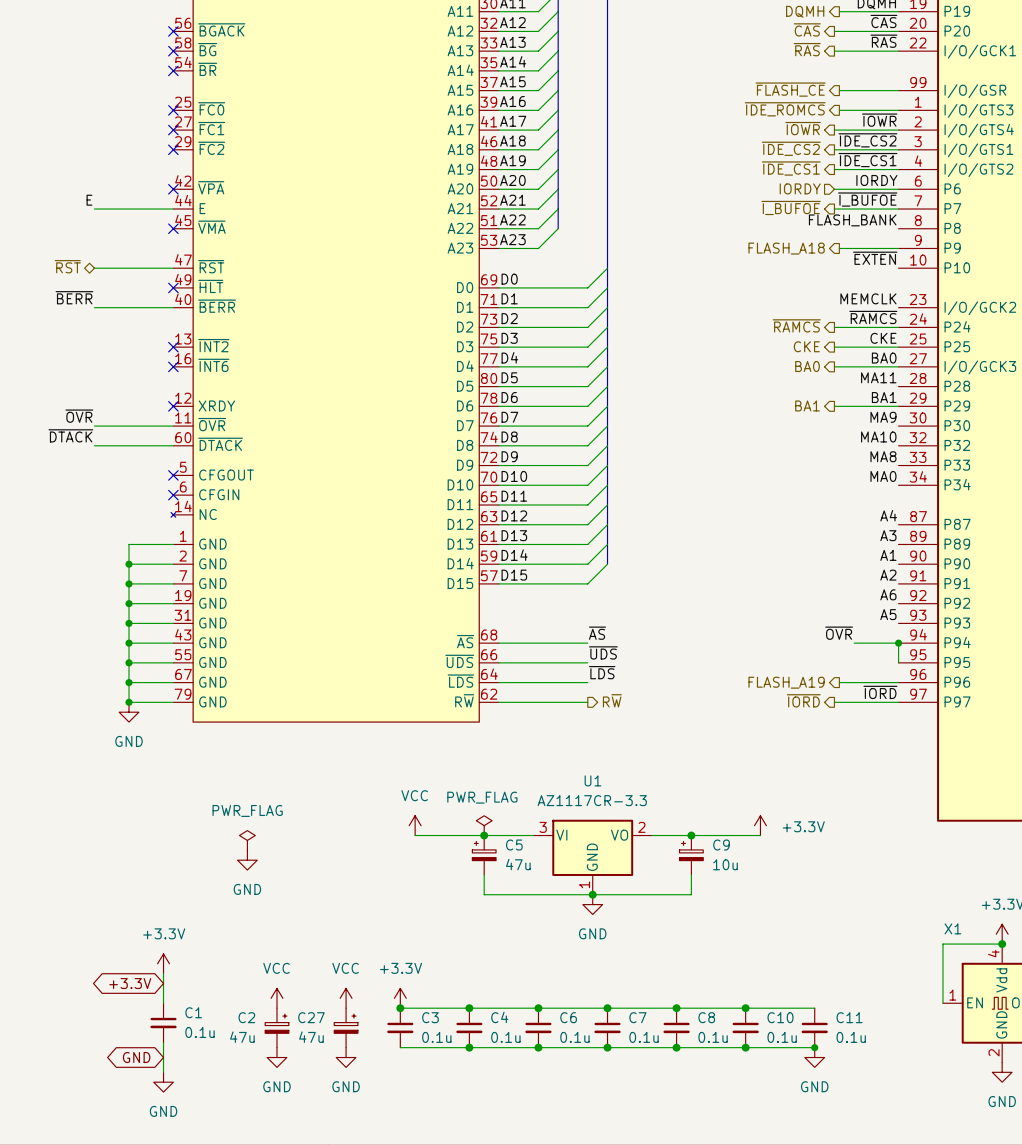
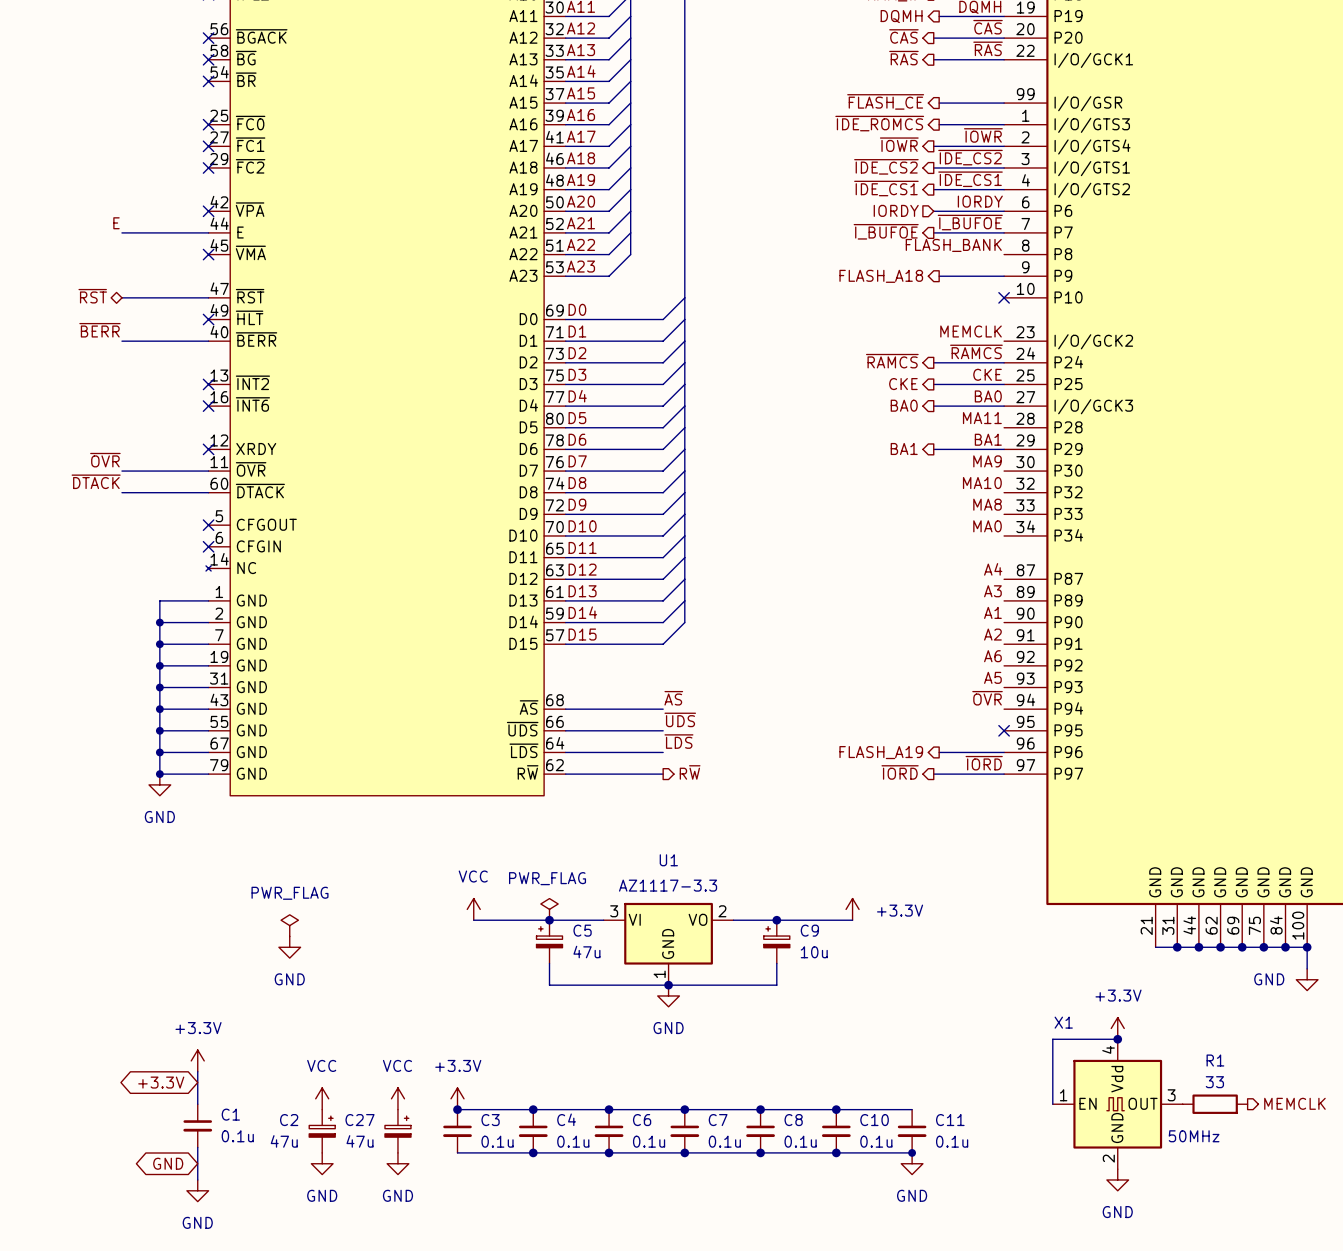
label: ~{EXTEN} (875, 258) -> none
no-connect mark: none -> (1004, 297)
label position: ~{OVR} (839, 633) -> ~{OVR} (987, 698)
wire: (854, 643) (898, 643) (898, 662) -> none
junction: (898, 643) -> none
no-connect mark: none -> (1004, 730)
U1 value: AZ1117CR-3.3 (592, 800) -> AZ1117-3.3 (668, 885)

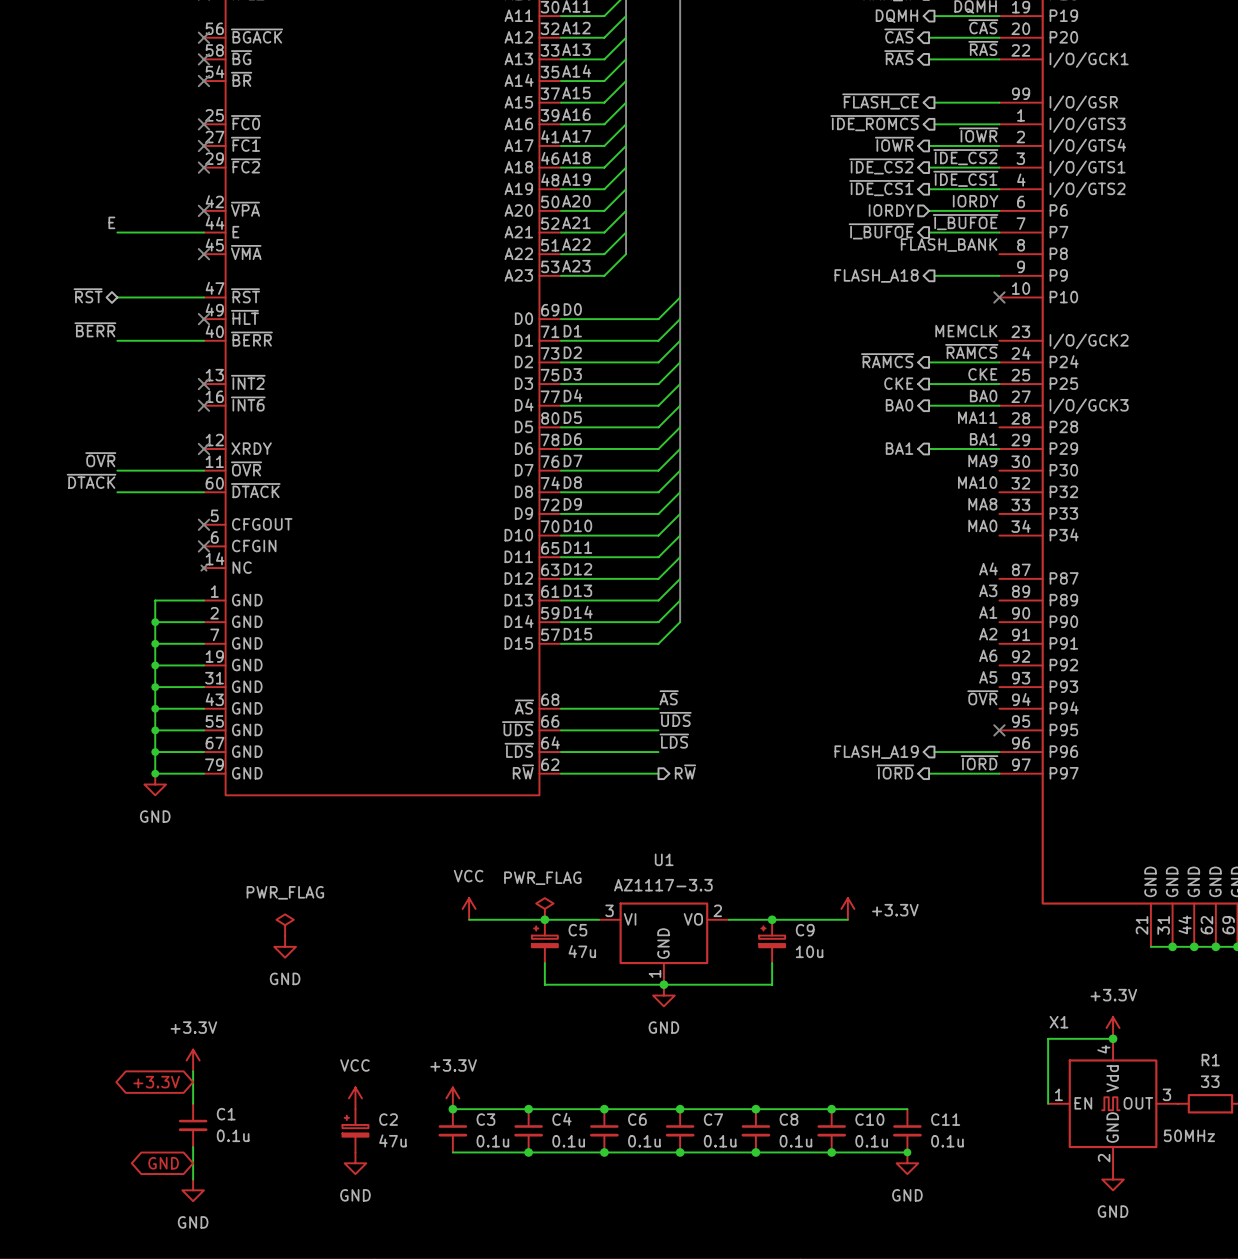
power symbol: VCC (322, 1098) -> none
power symbol: none -> VCC (355, 1098)
power symbol: VCC (397, 1098) -> none
C2 flip: as is (322, 1126) -> left-right (355, 1126)
C2 position: (322, 1131) -> (355, 1130)
C27: 47u (397, 1131) -> none
power symbol: GND (322, 1163) -> none
power symbol: none -> GND (355, 1163)
power symbol: GND (397, 1163) -> none

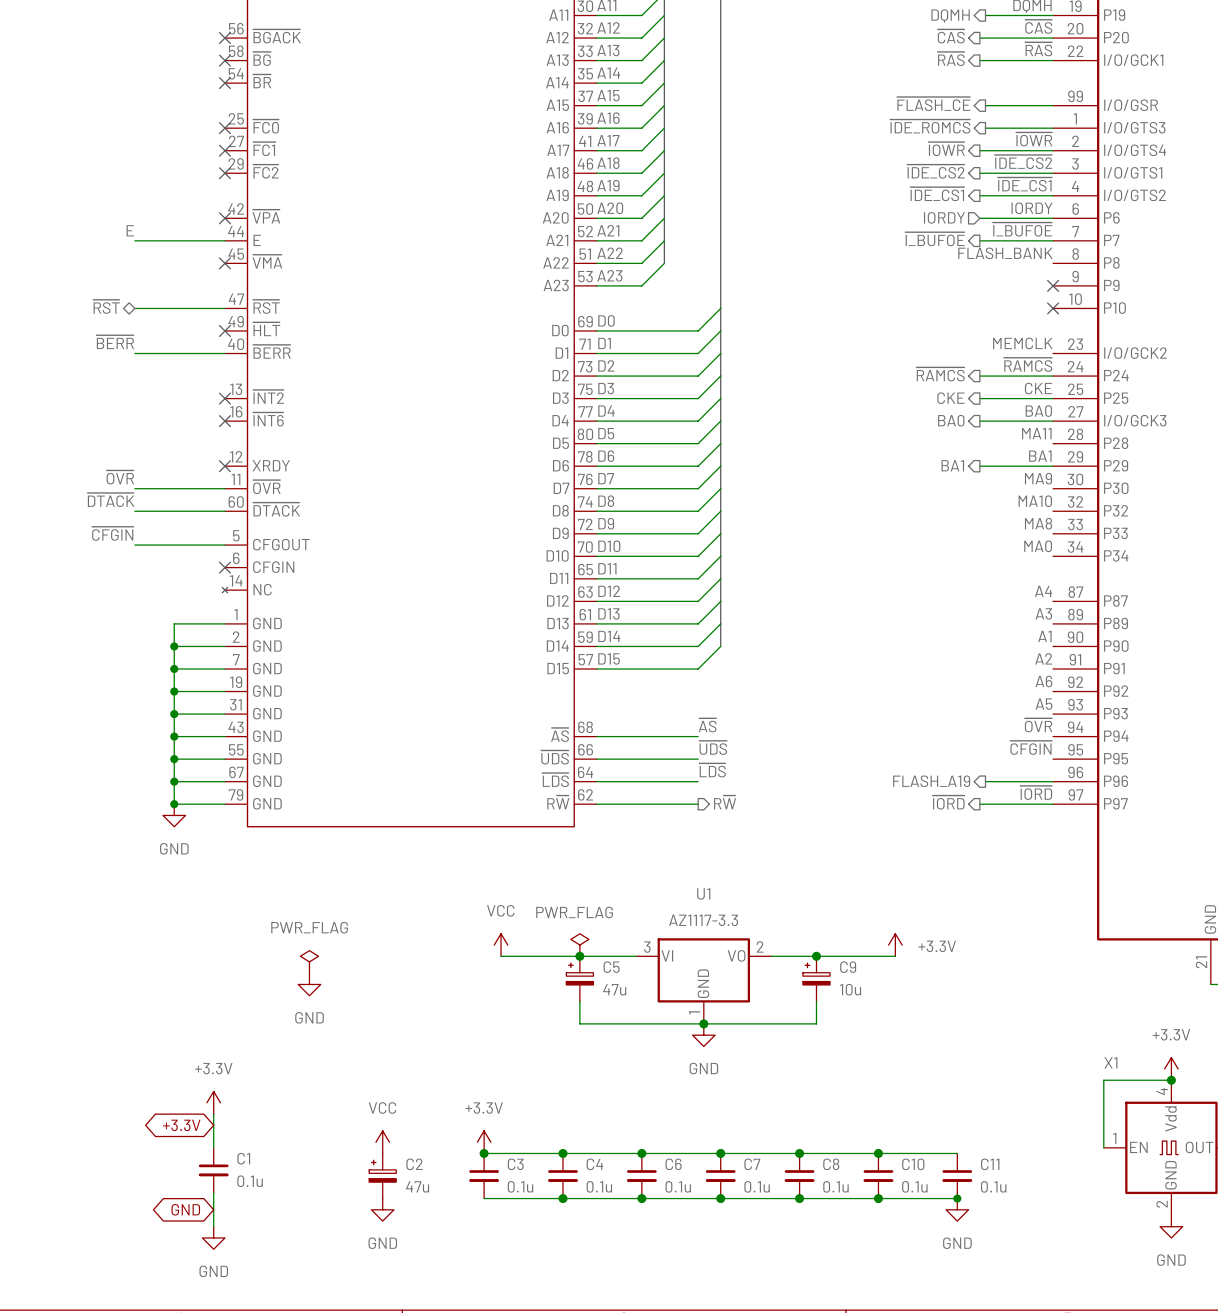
hierarchical label: FLASH_A18 (876, 275) -> none
wire: (934, 275) (999, 275) -> none
no-connect mark: none -> (1053, 285)
label: none -> ~{CFGIN} (112, 533)
wire: none -> (134, 545) (224, 545)
no-connect mark: (203, 524) -> none
label: none -> ~{CFGIN} (1031, 747)
no-connect mark: (999, 730) -> none

